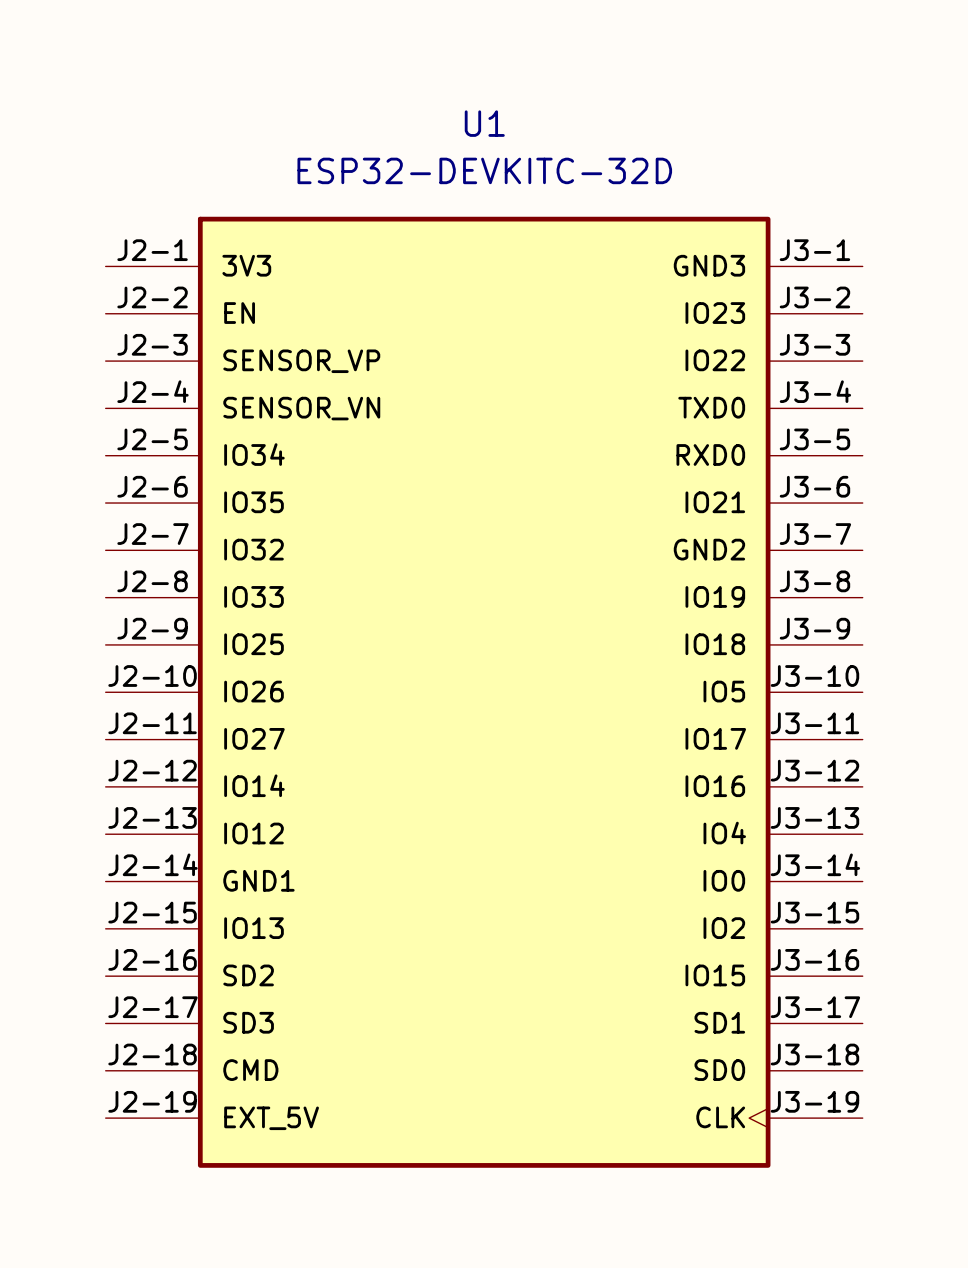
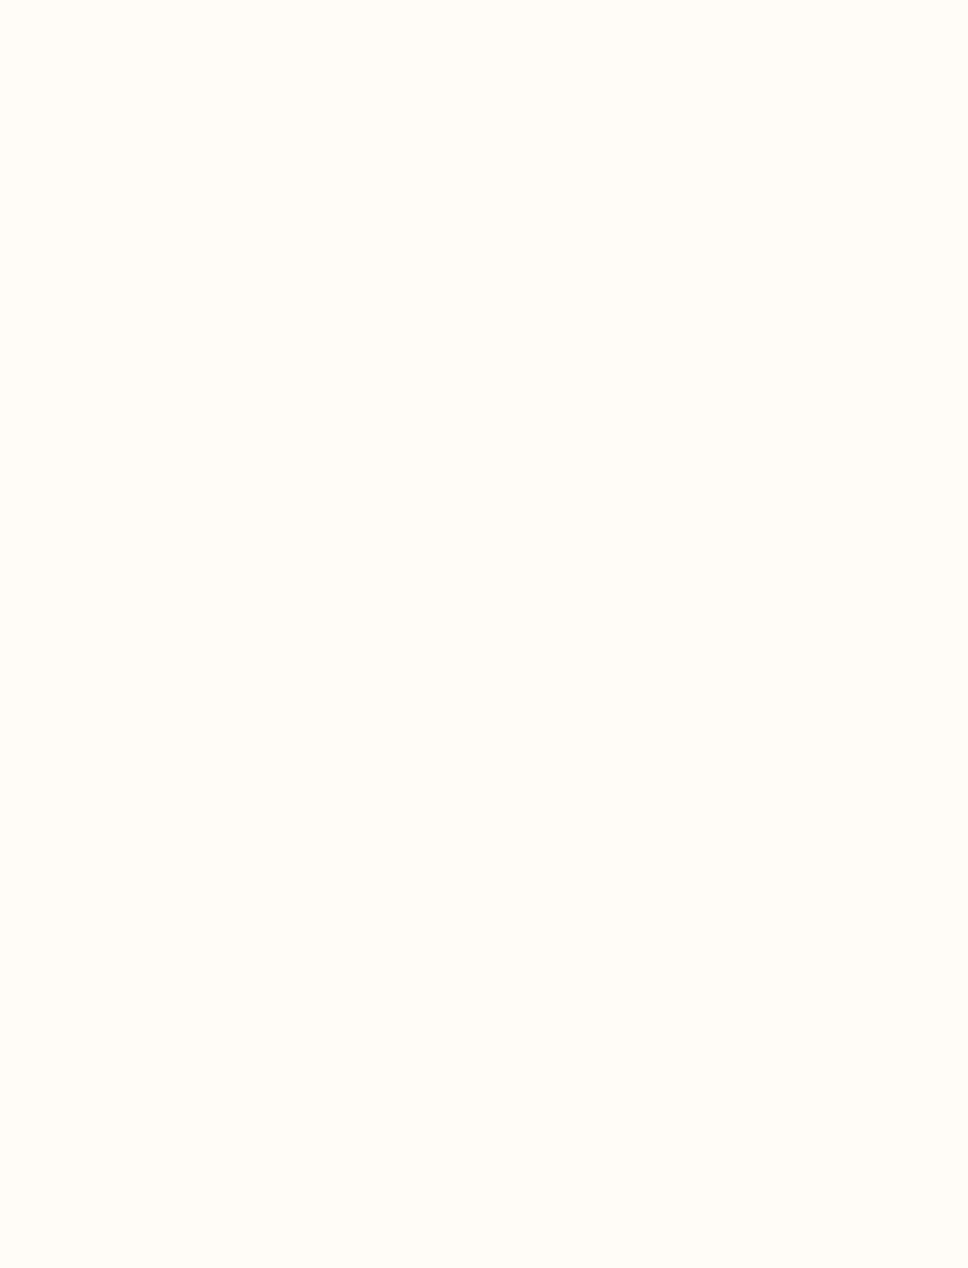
U1: ESP32-DEVKITC-32D (484, 692) -> none

